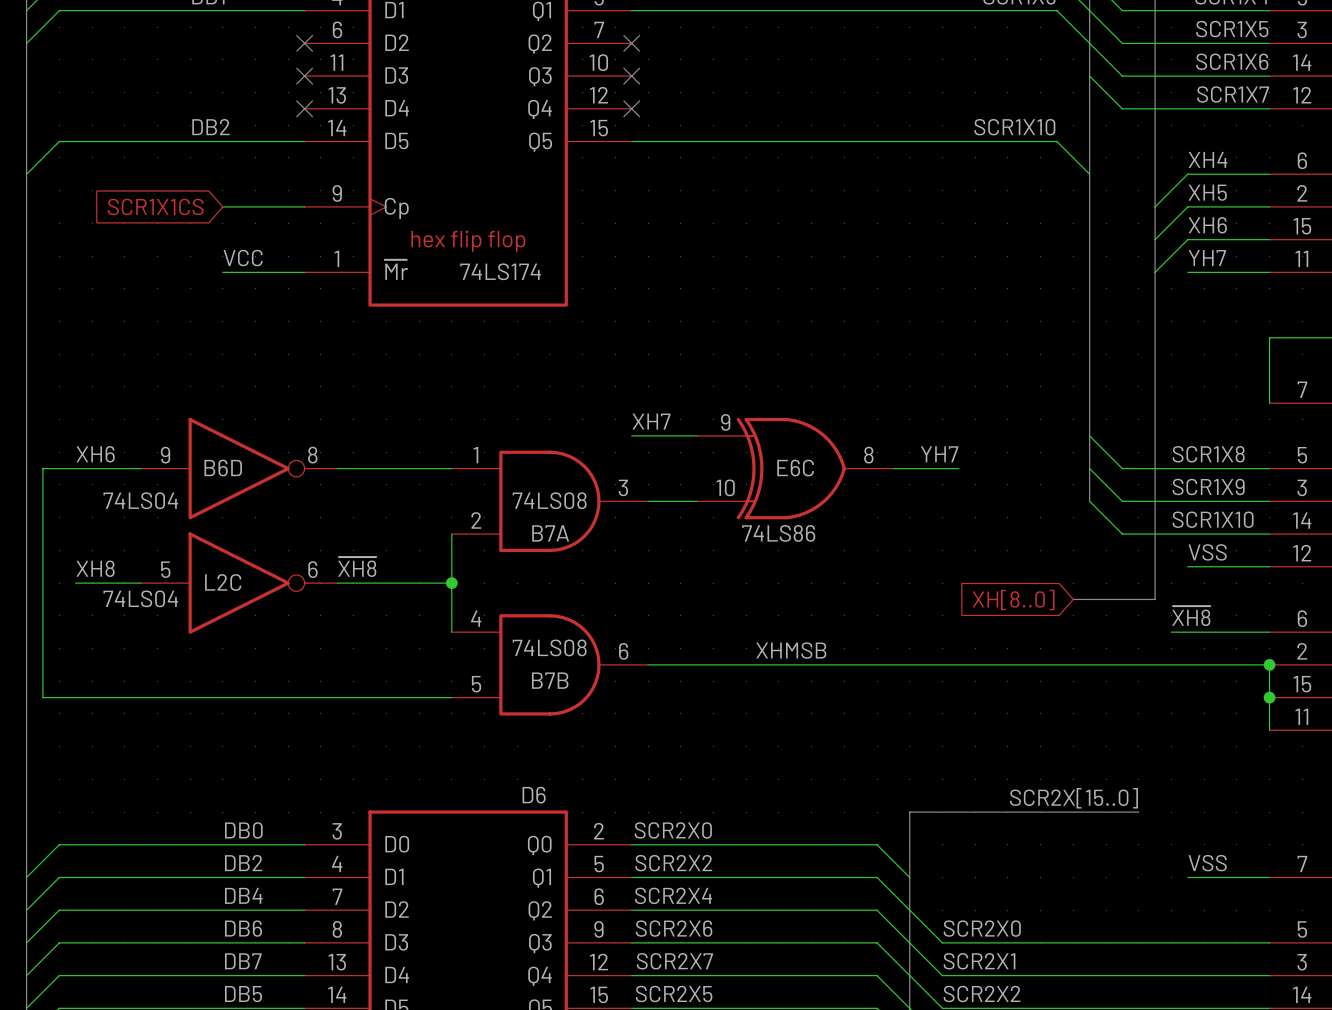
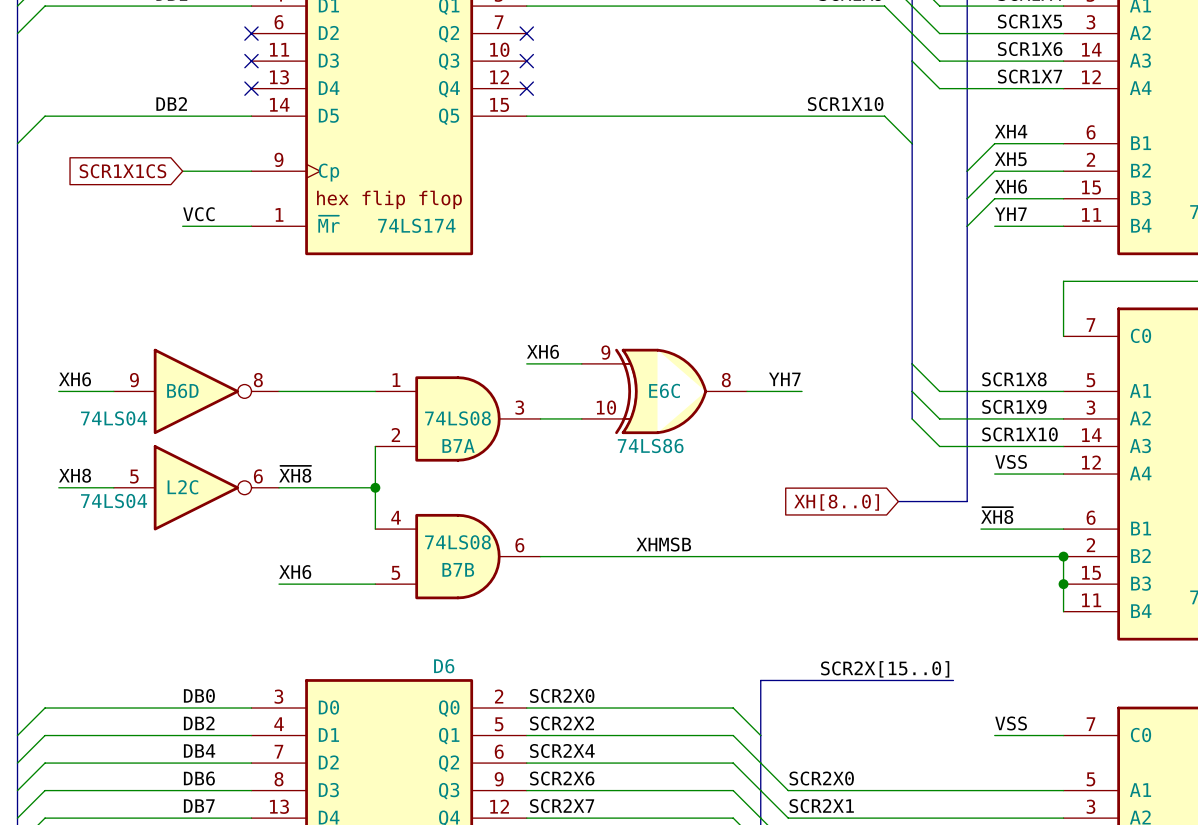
label: XH7 (651, 421) -> XH6 (542, 351)
wire: (75, 468) (42, 468) (42, 697) (337, 697) -> none
label: none -> XH6 (295, 572)

